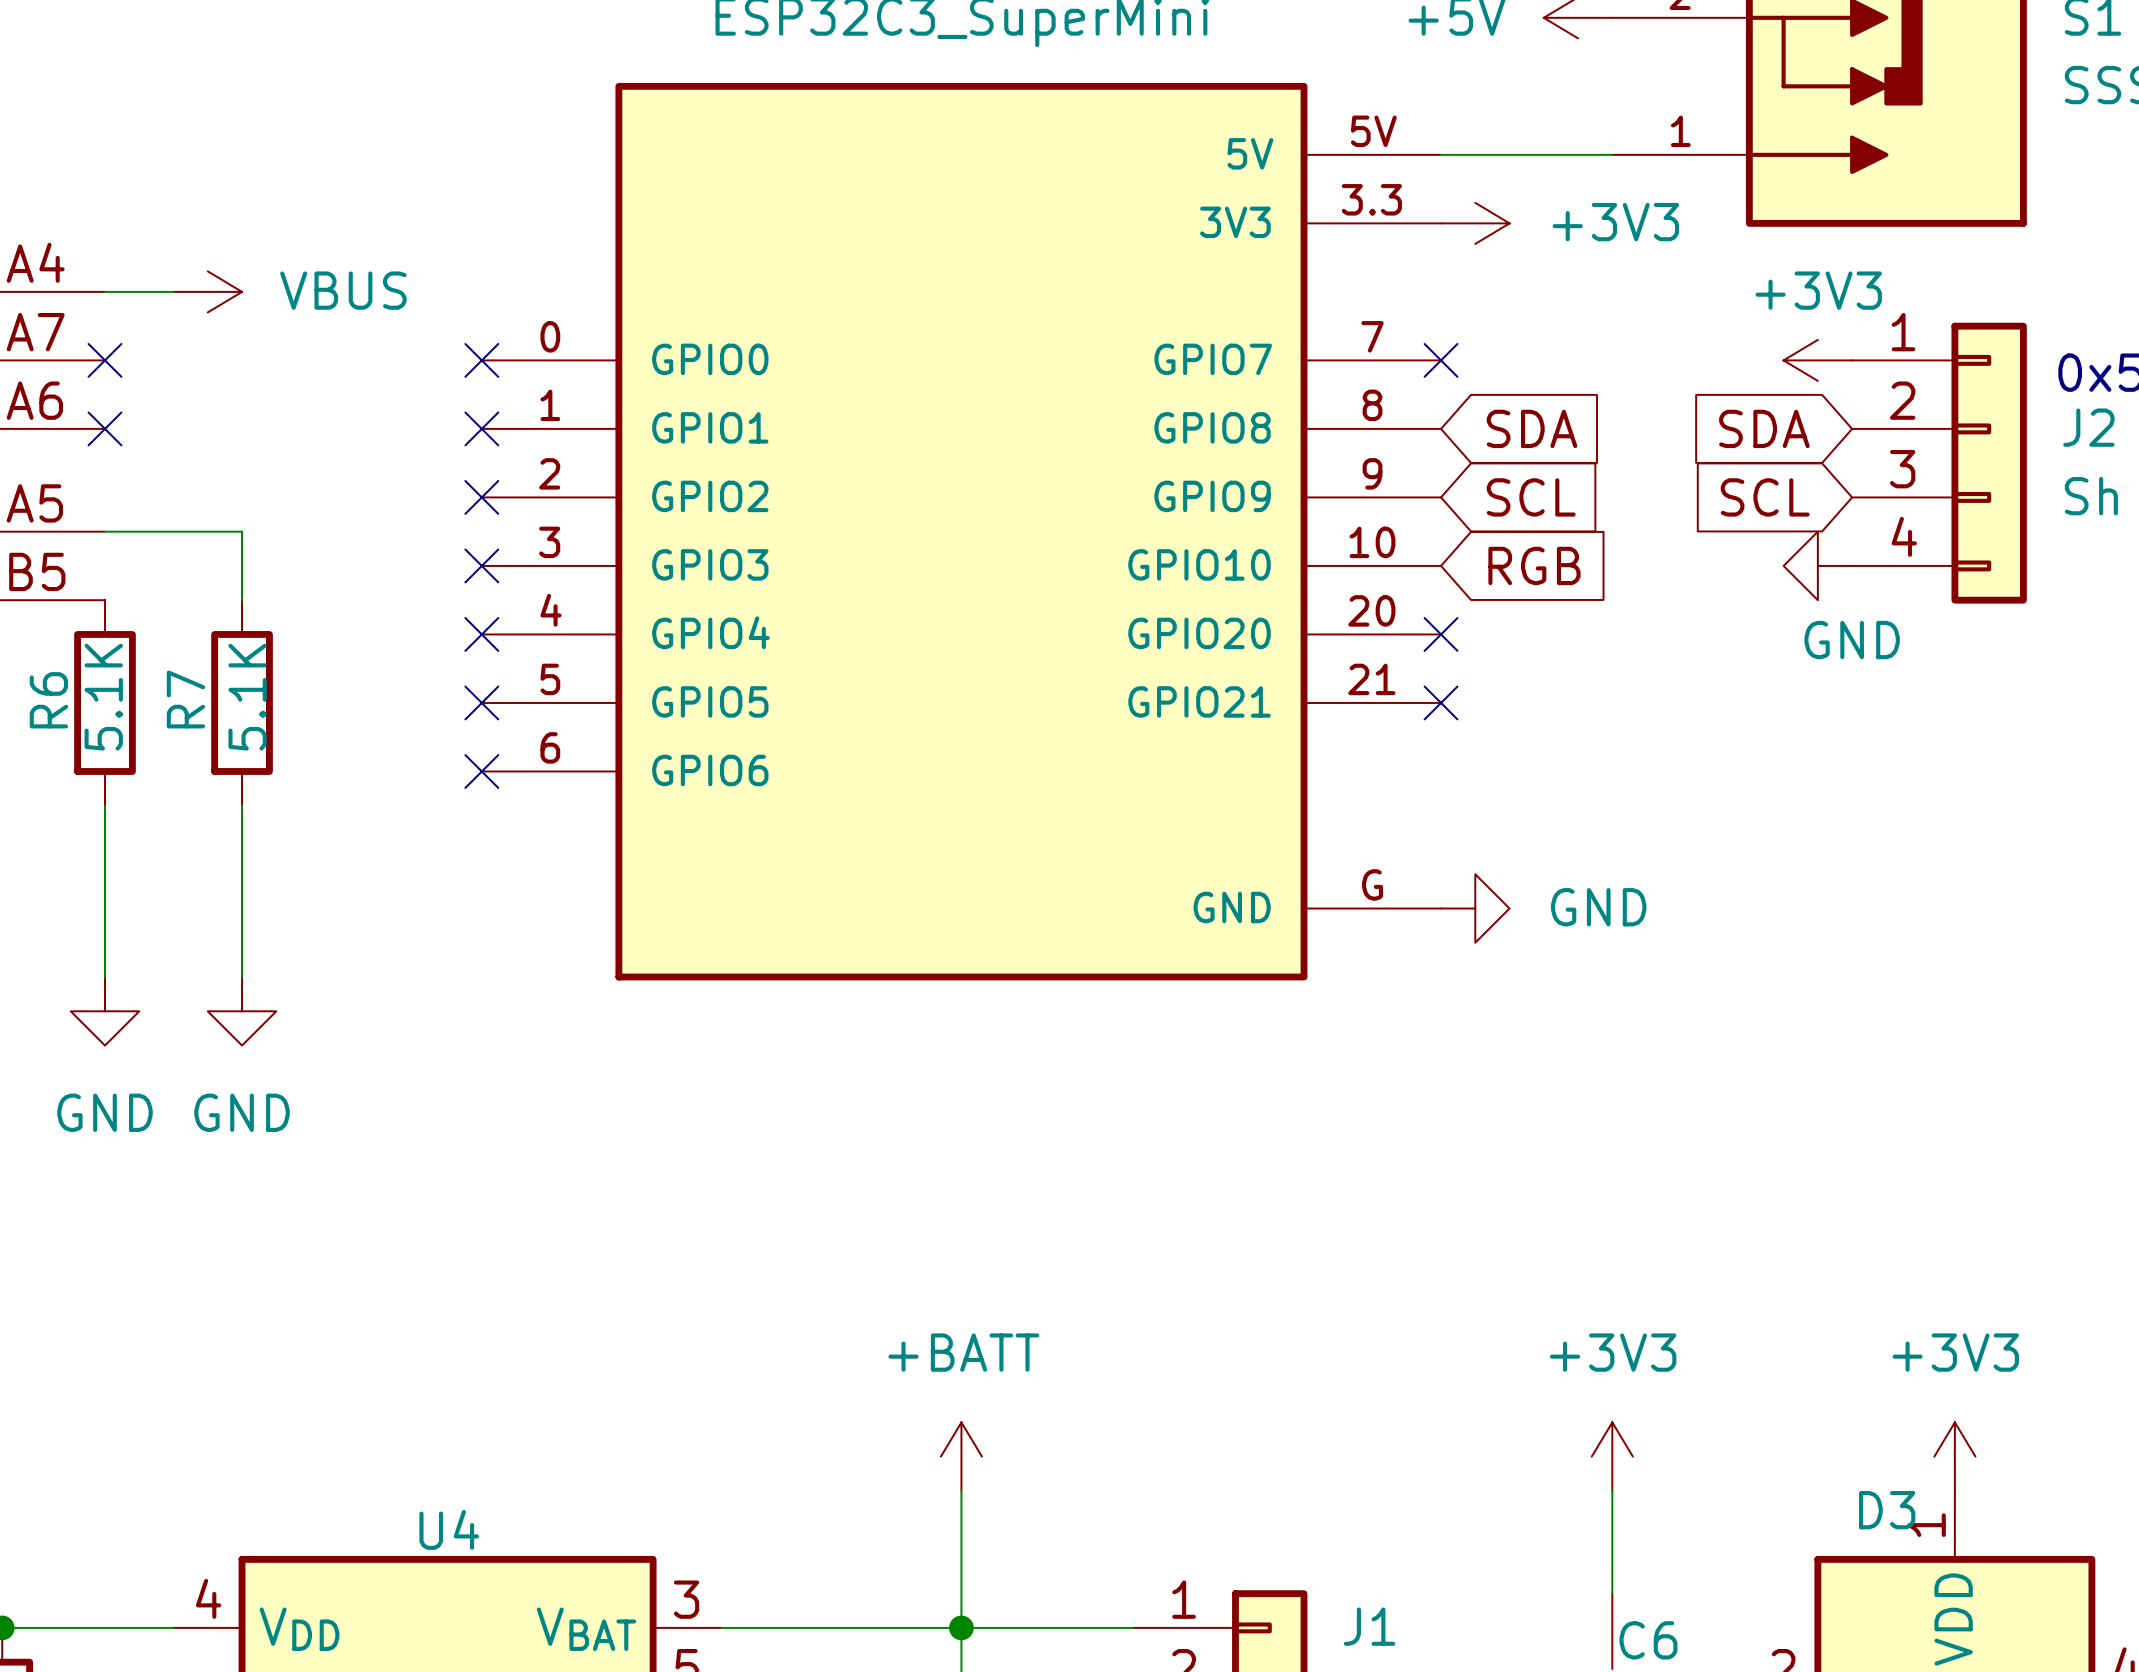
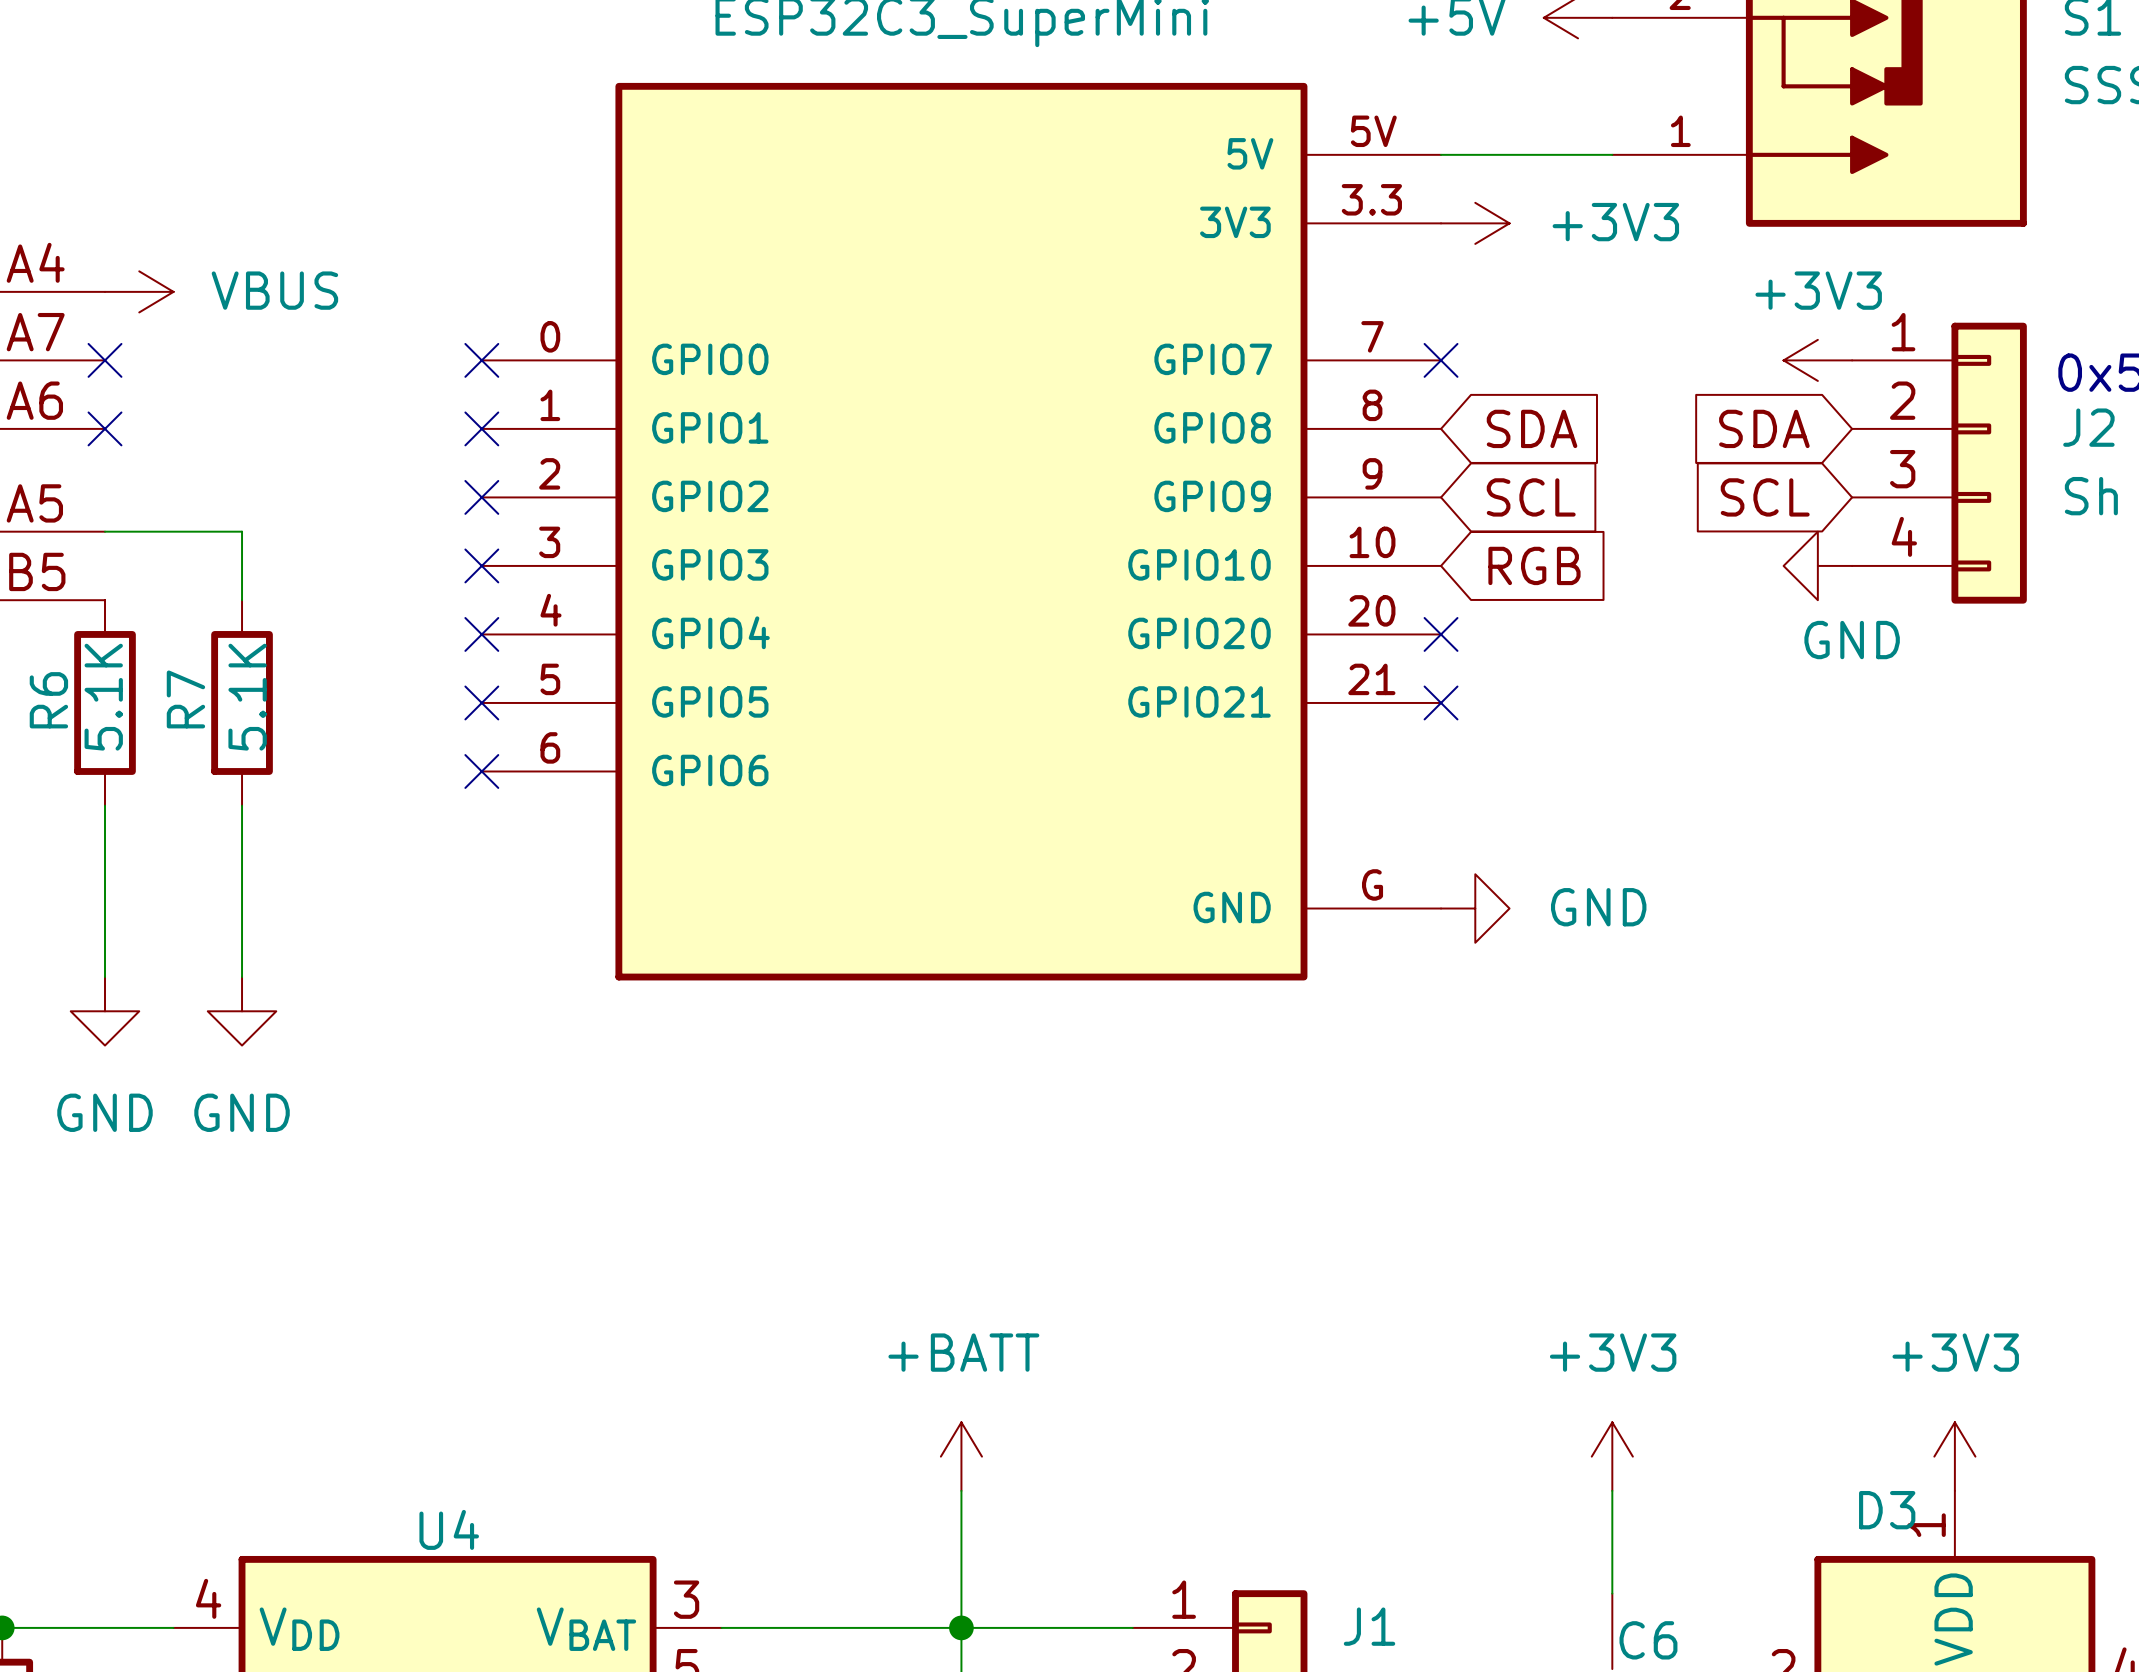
power symbol position: VBUS (207, 291) -> VBUS (139, 291)

